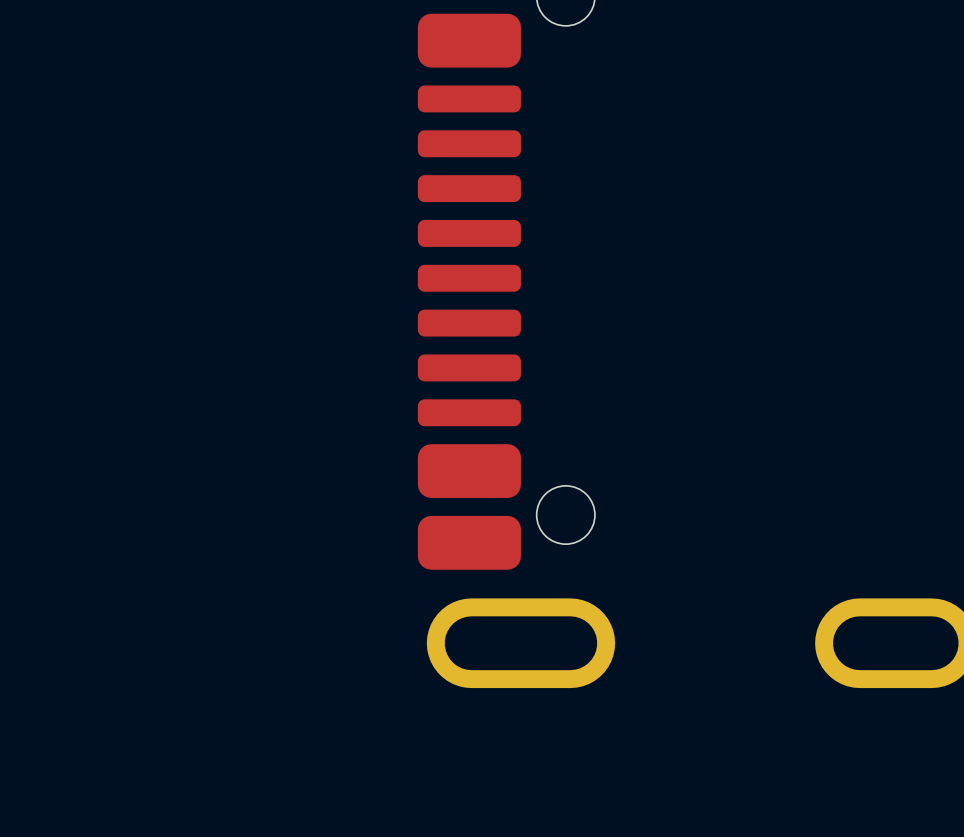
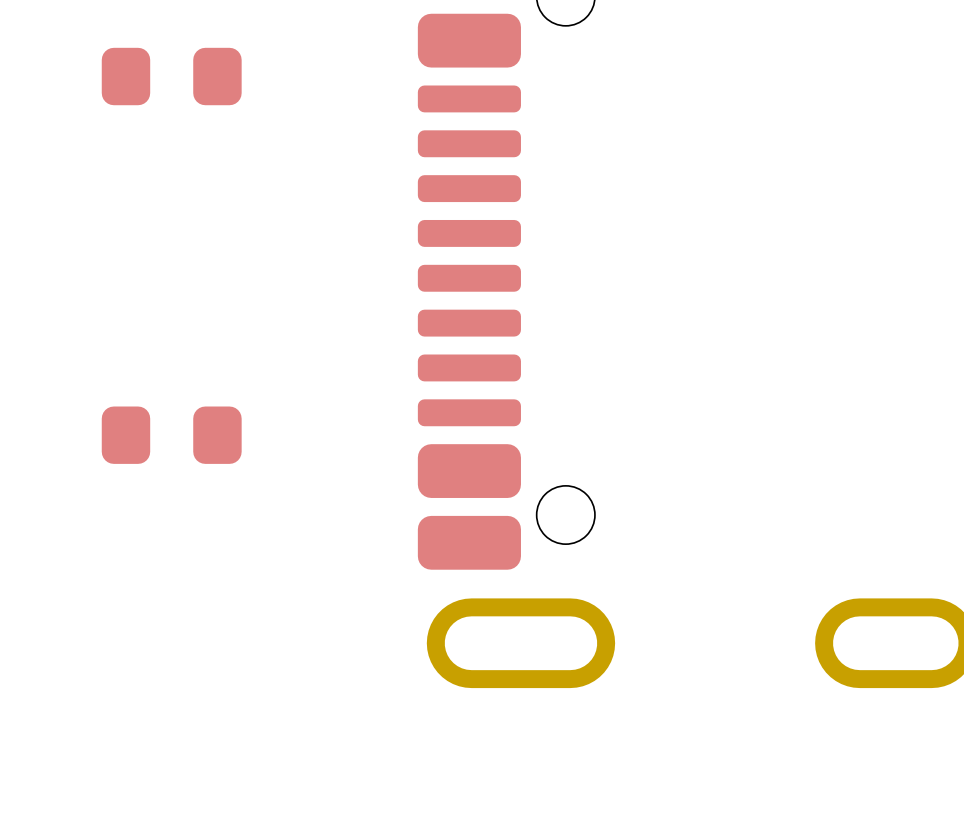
part: none -> (171, 76)
part: none -> (171, 435)

